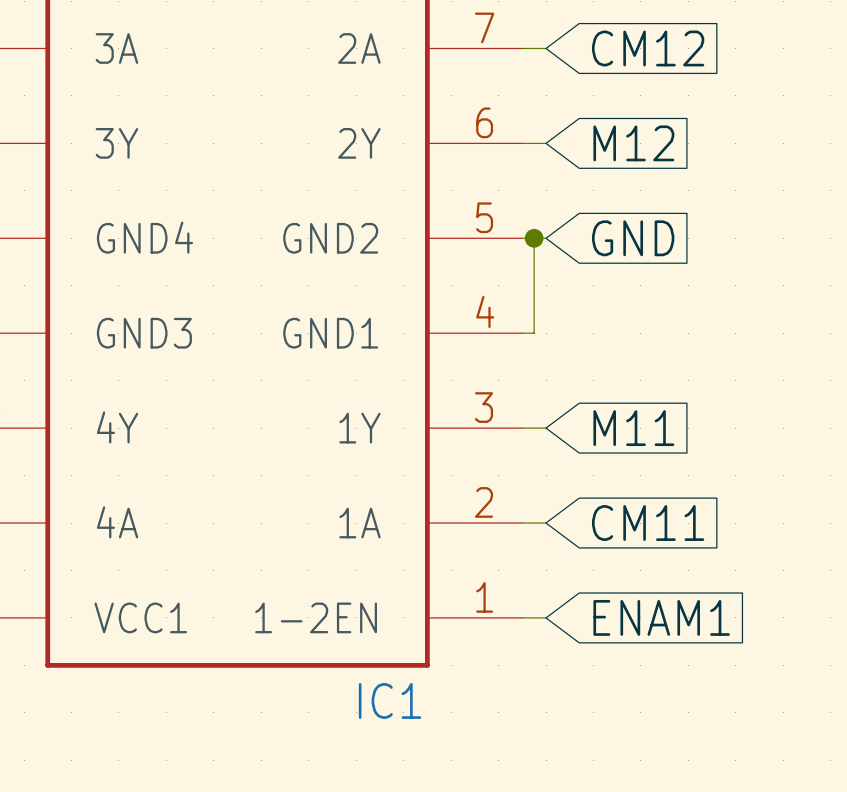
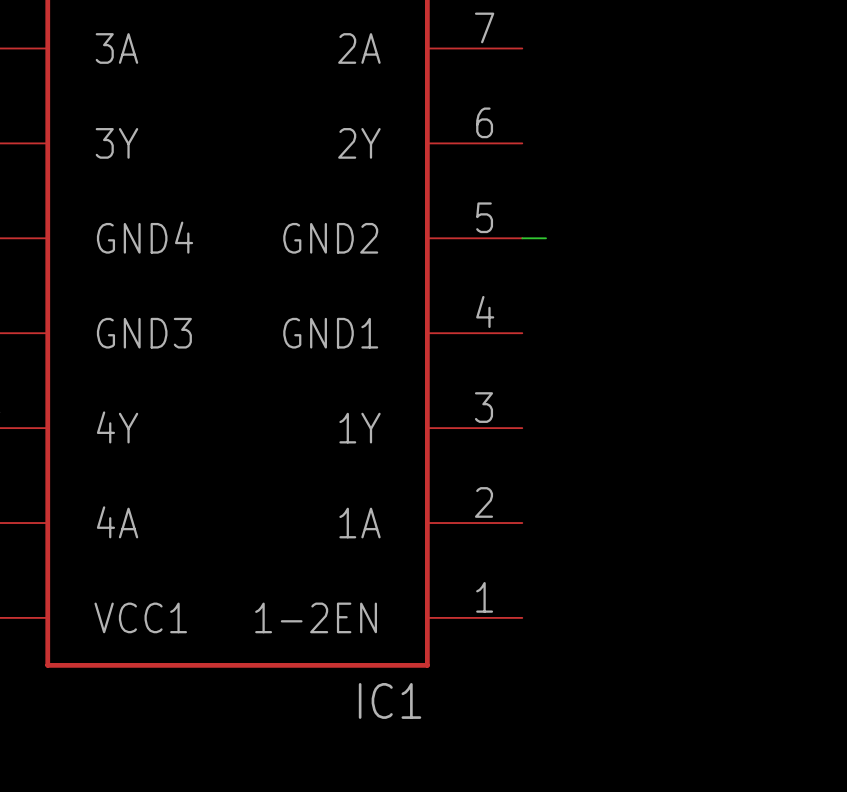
wire: (522, 48) (546, 48) -> none
global label: CM12 (648, 48) -> none
wire: (522, 143) (546, 143) -> none
global label: M12 (633, 143) -> none
wire: (534, 238) (534, 333) (522, 333) -> none
junction: (534, 238) -> none
global label: GND (633, 238) -> none
wire: (522, 428) (546, 428) -> none
global label: M11 (633, 428) -> none
wire: (522, 523) (546, 523) -> none
global label: CM11 (648, 523) -> none
wire: (522, 617) (546, 617) -> none
global label: ENAM1 (661, 617) -> none

